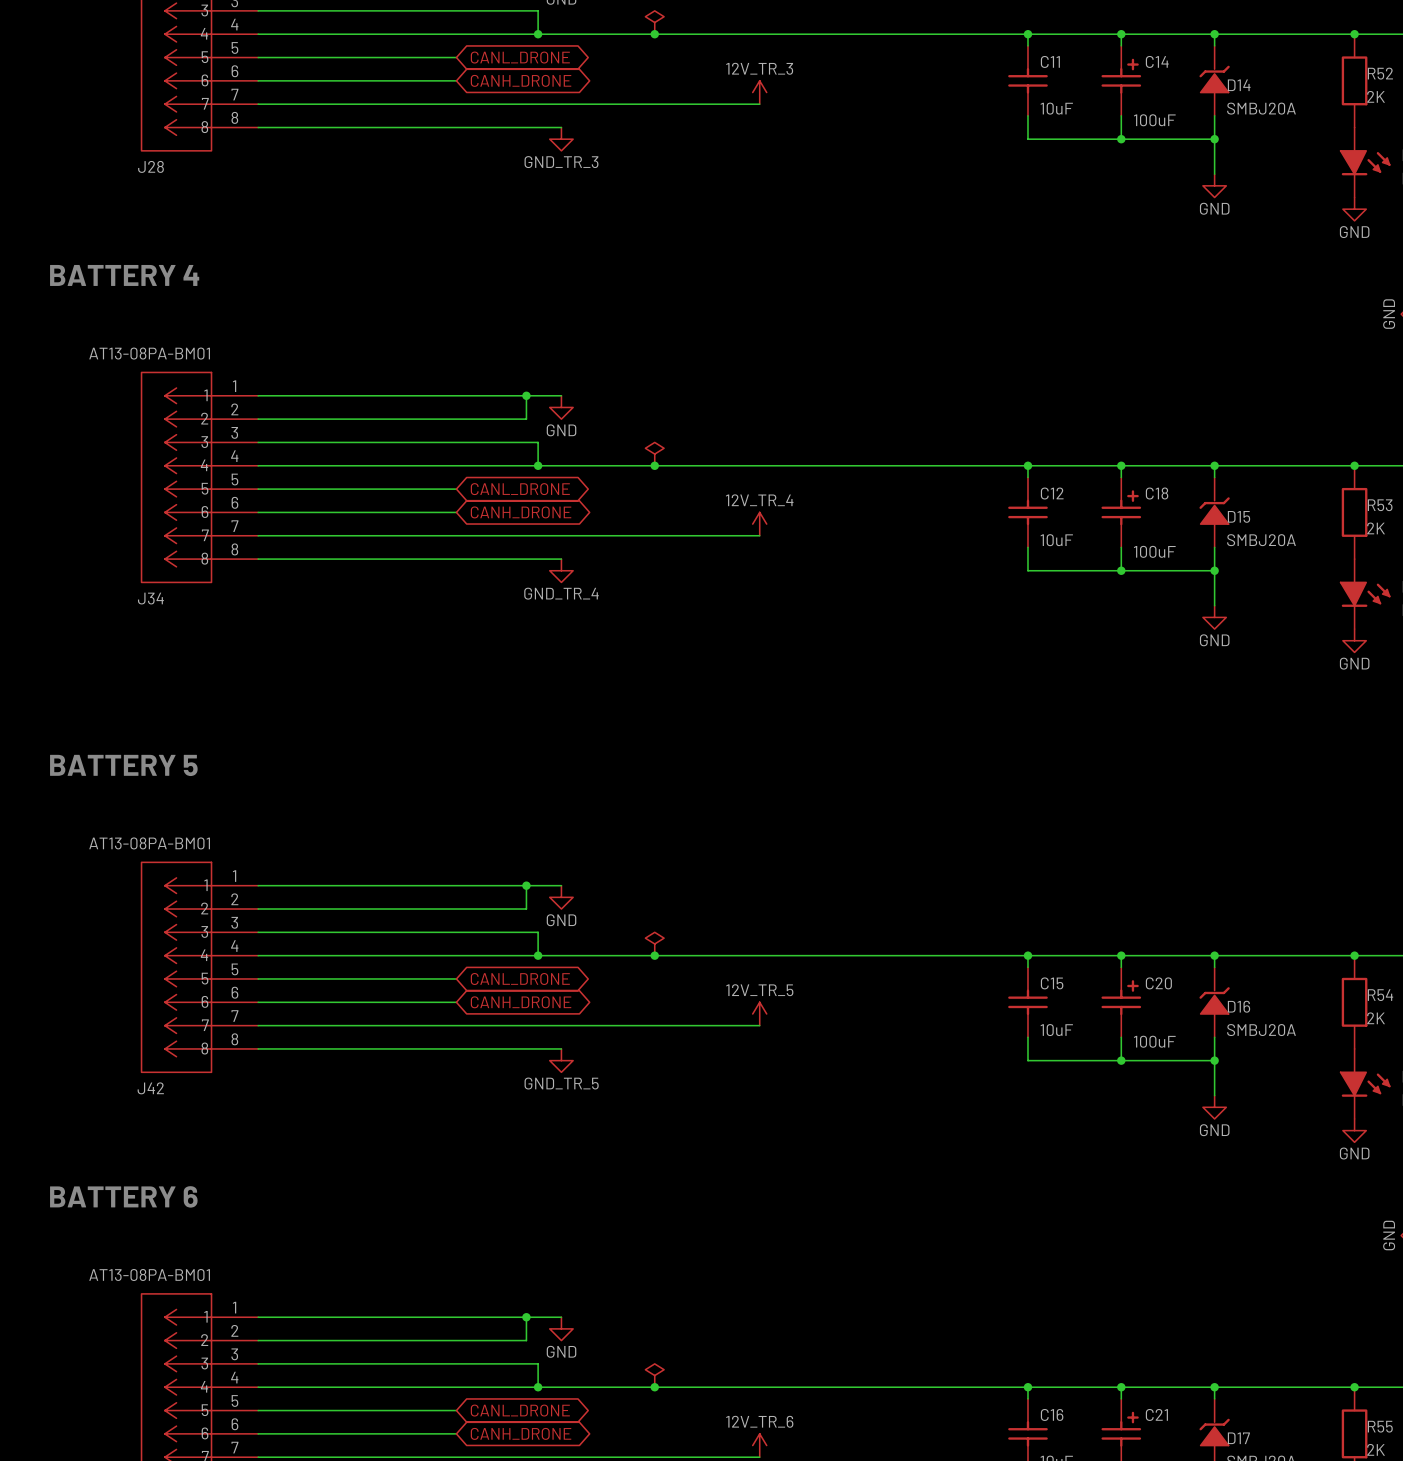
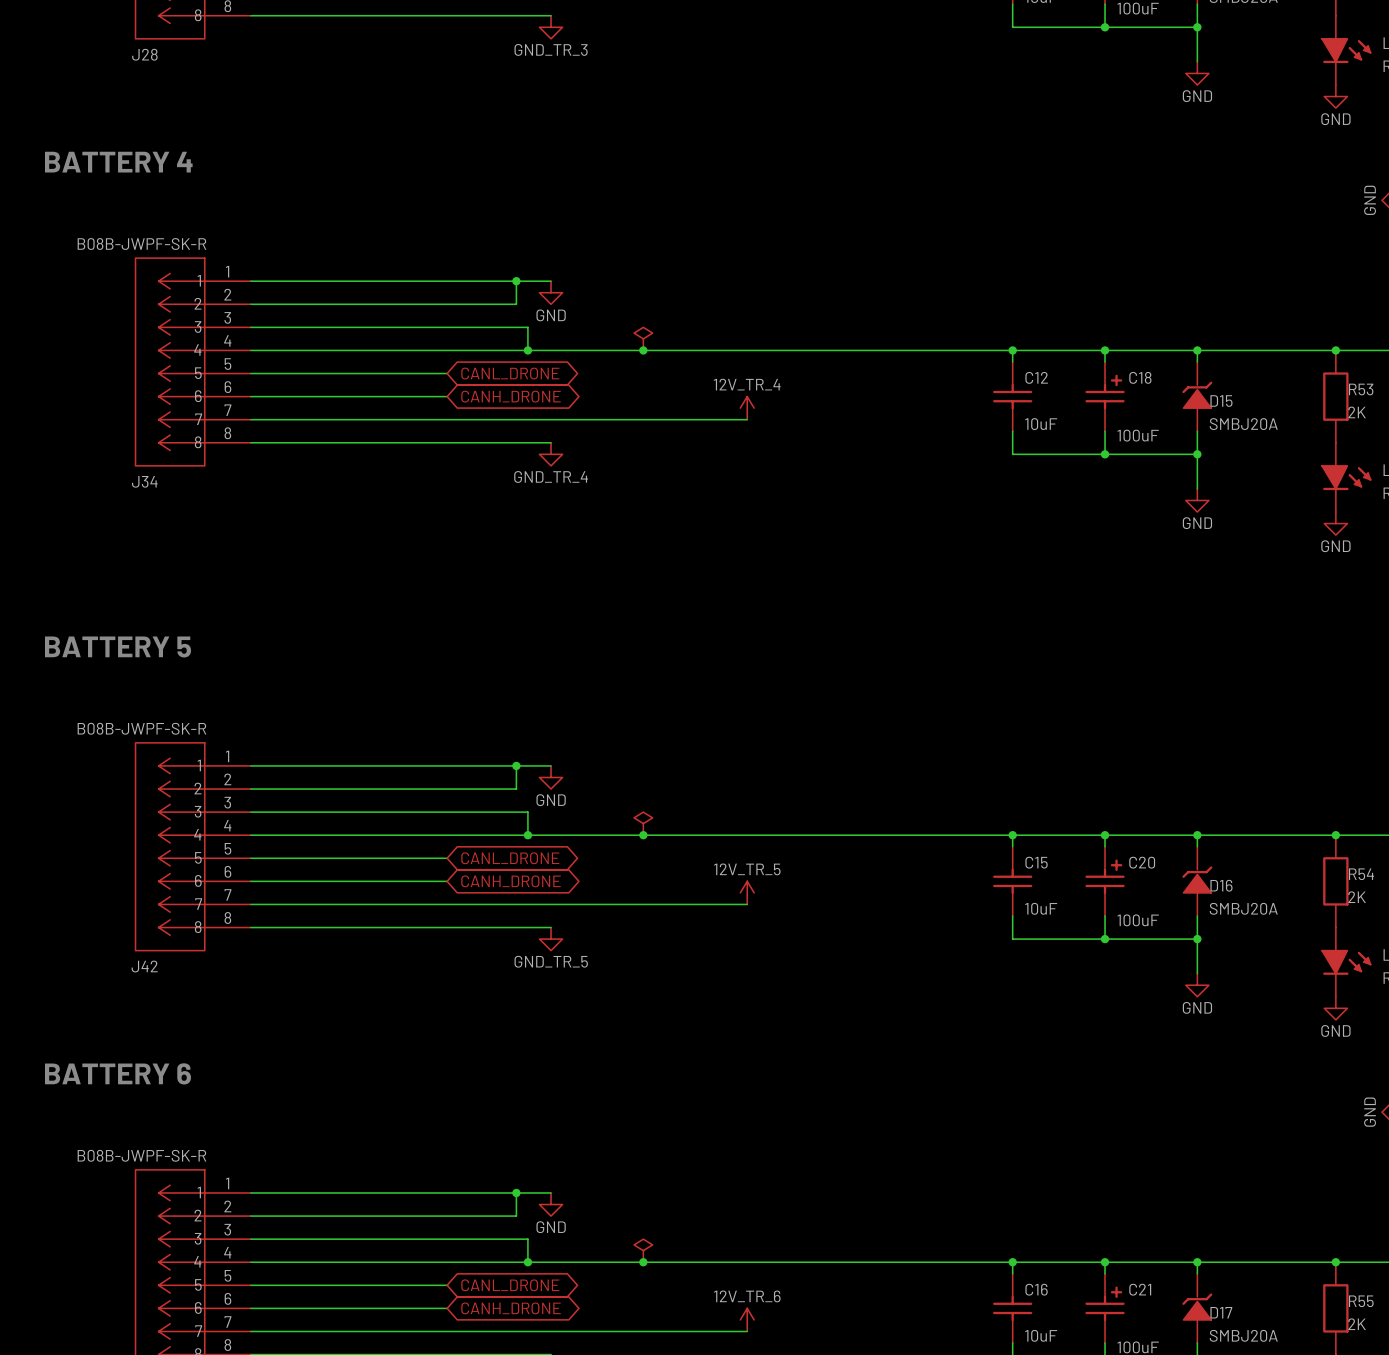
J34 value: AT13-08PA-BM01 (149, 353) -> B08B-JWPF-SK-R (141, 244)
J42 value: AT13-08PA-BM01 (149, 843) -> B08B-JWPF-SK-R (141, 728)
part value: AT13-08PA-BM01 (149, 1274) -> B08B-JWPF-SK-R (141, 1155)

